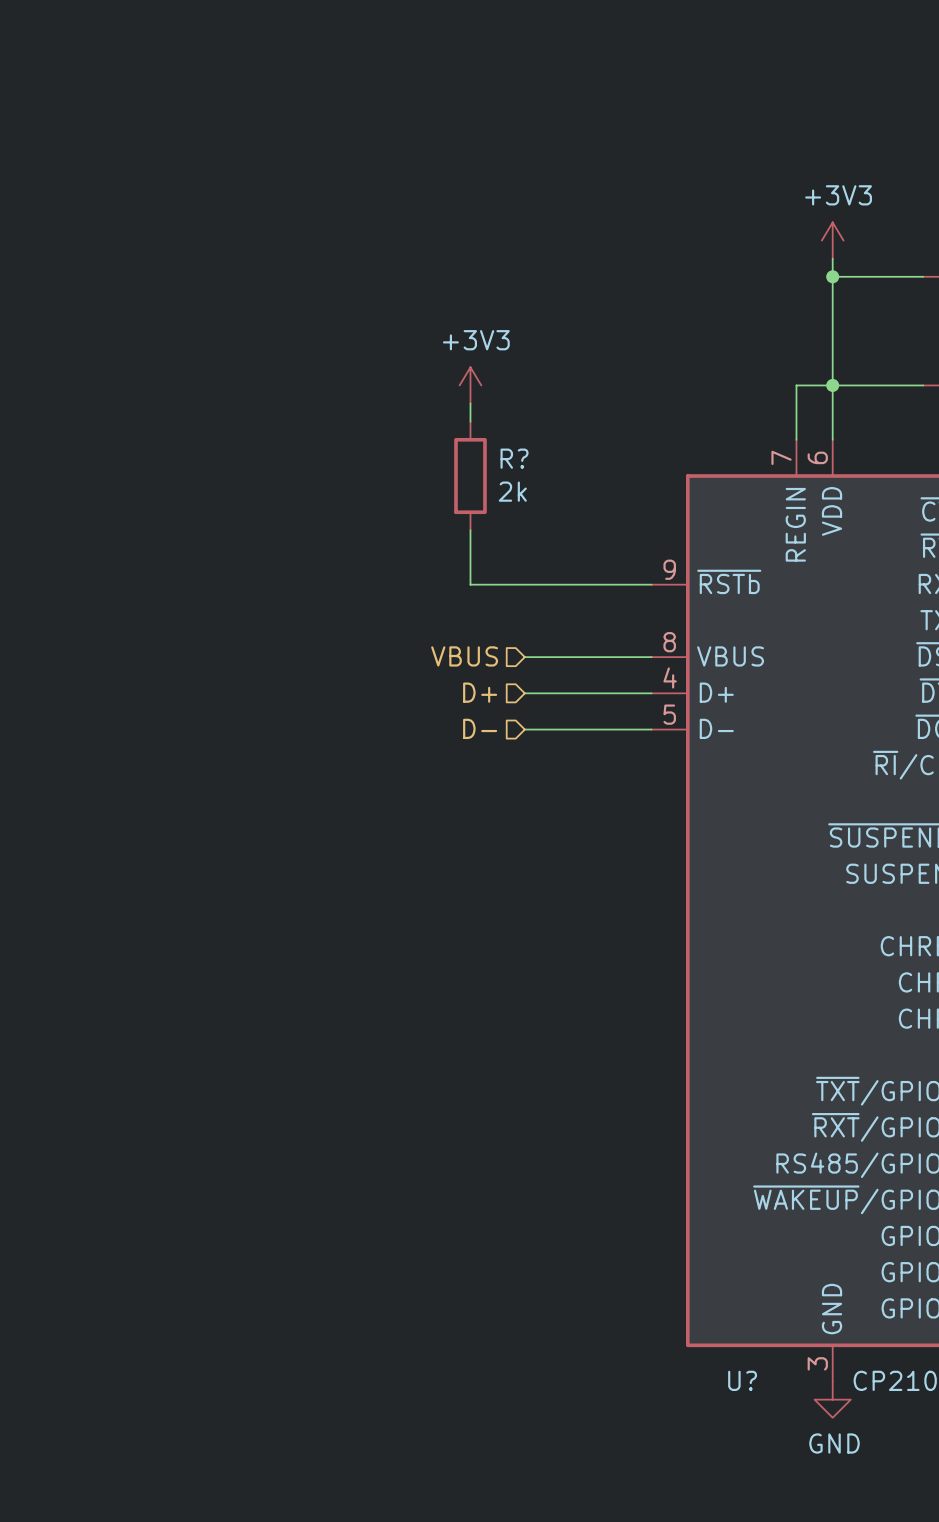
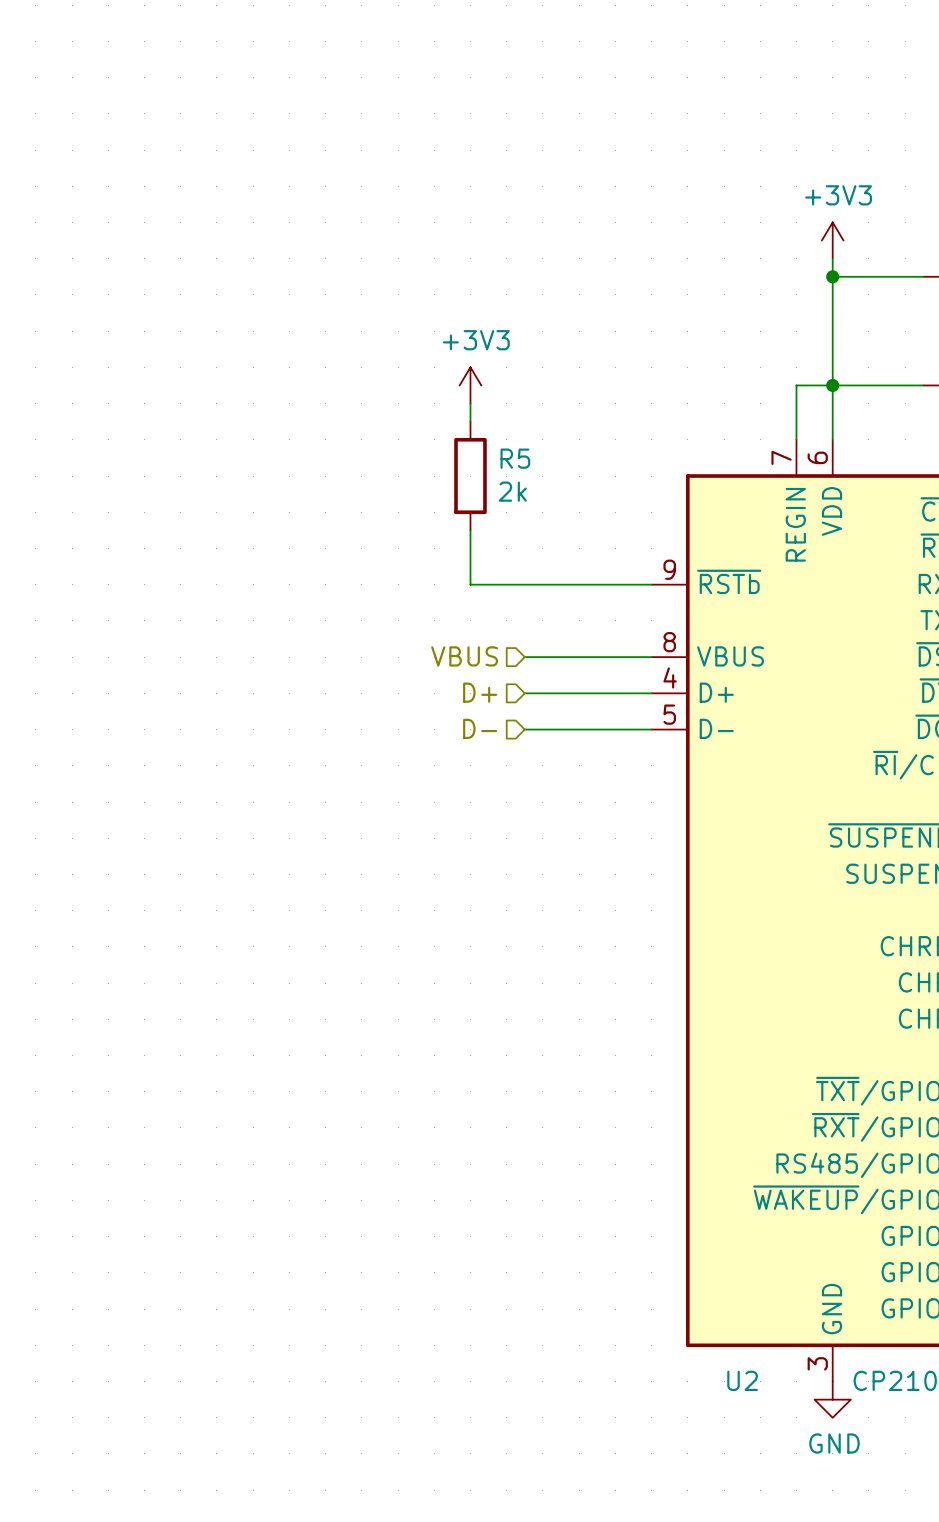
R? name: R? (514, 458) -> R5 (515, 458)
U? name: U? (742, 1380) -> U2 (742, 1380)

